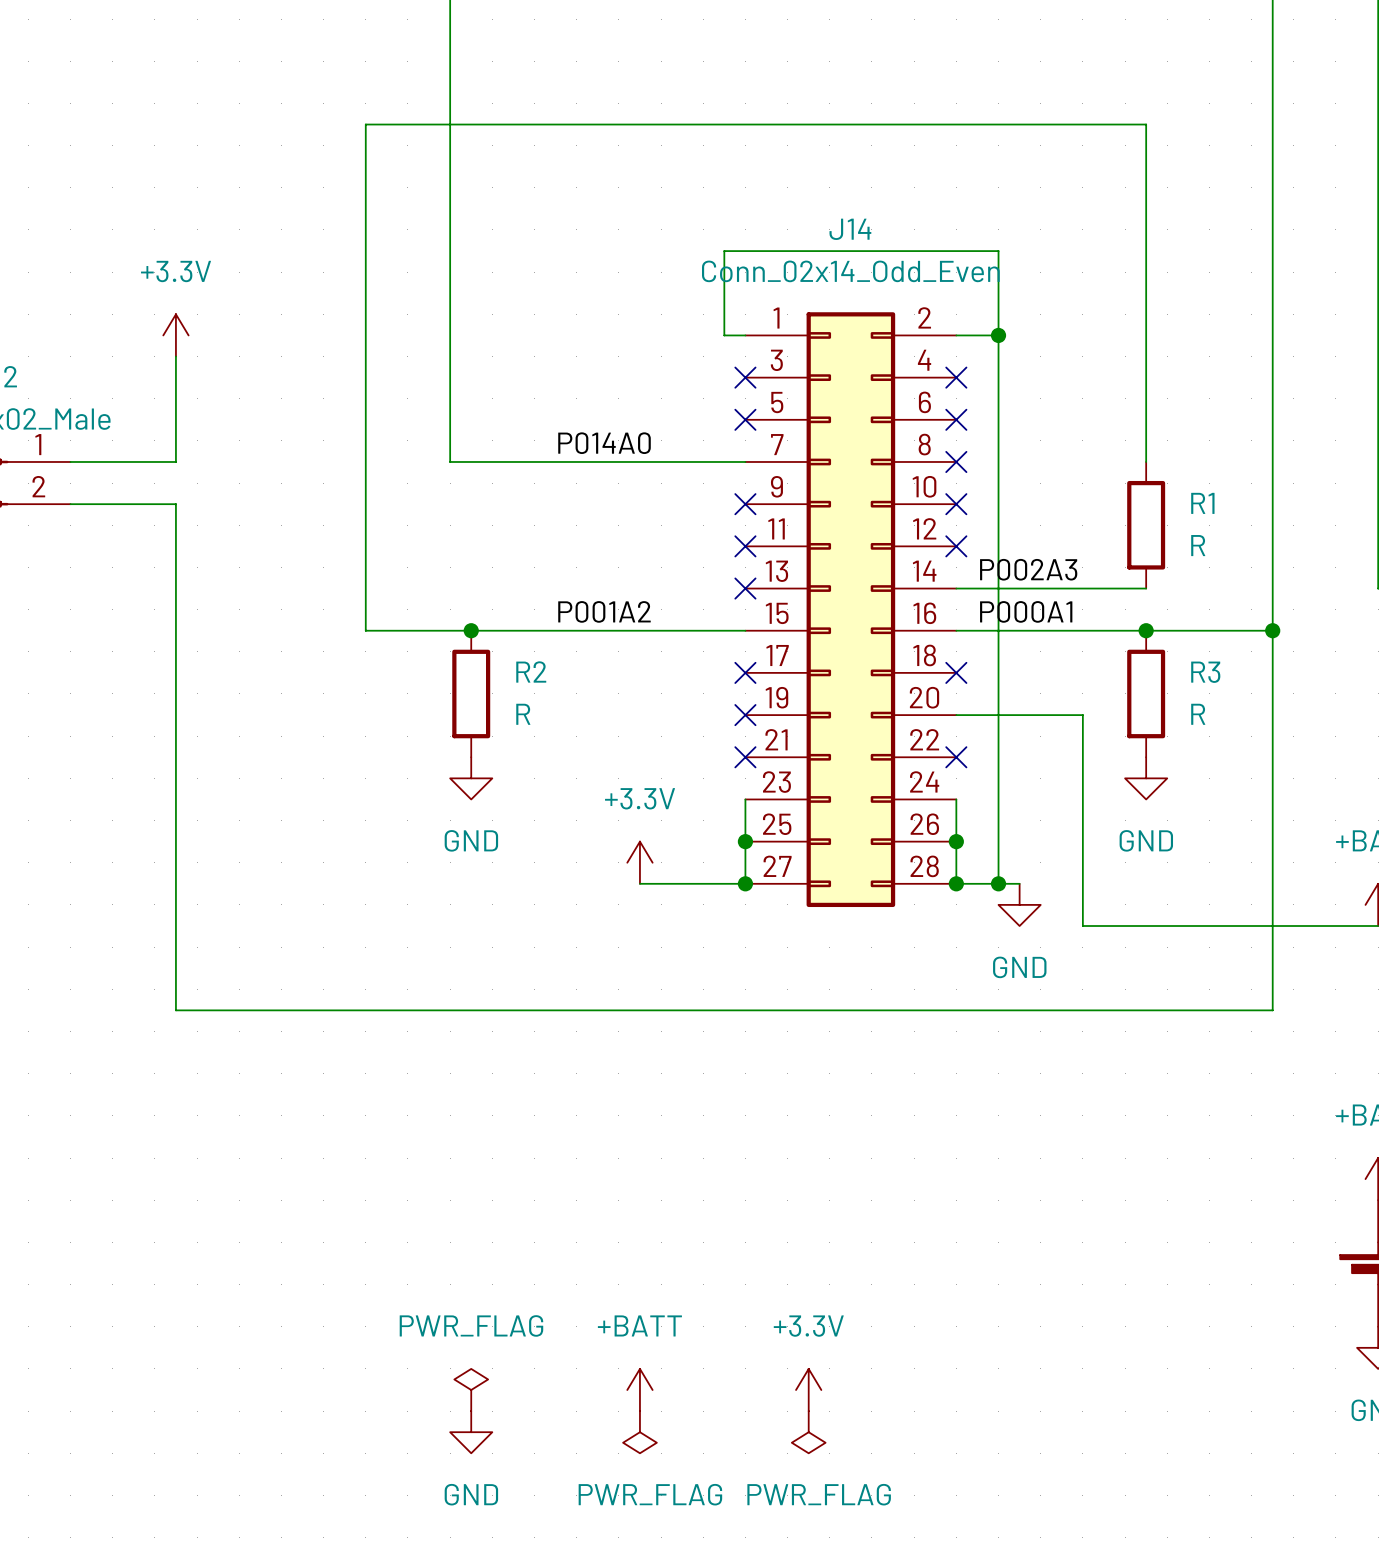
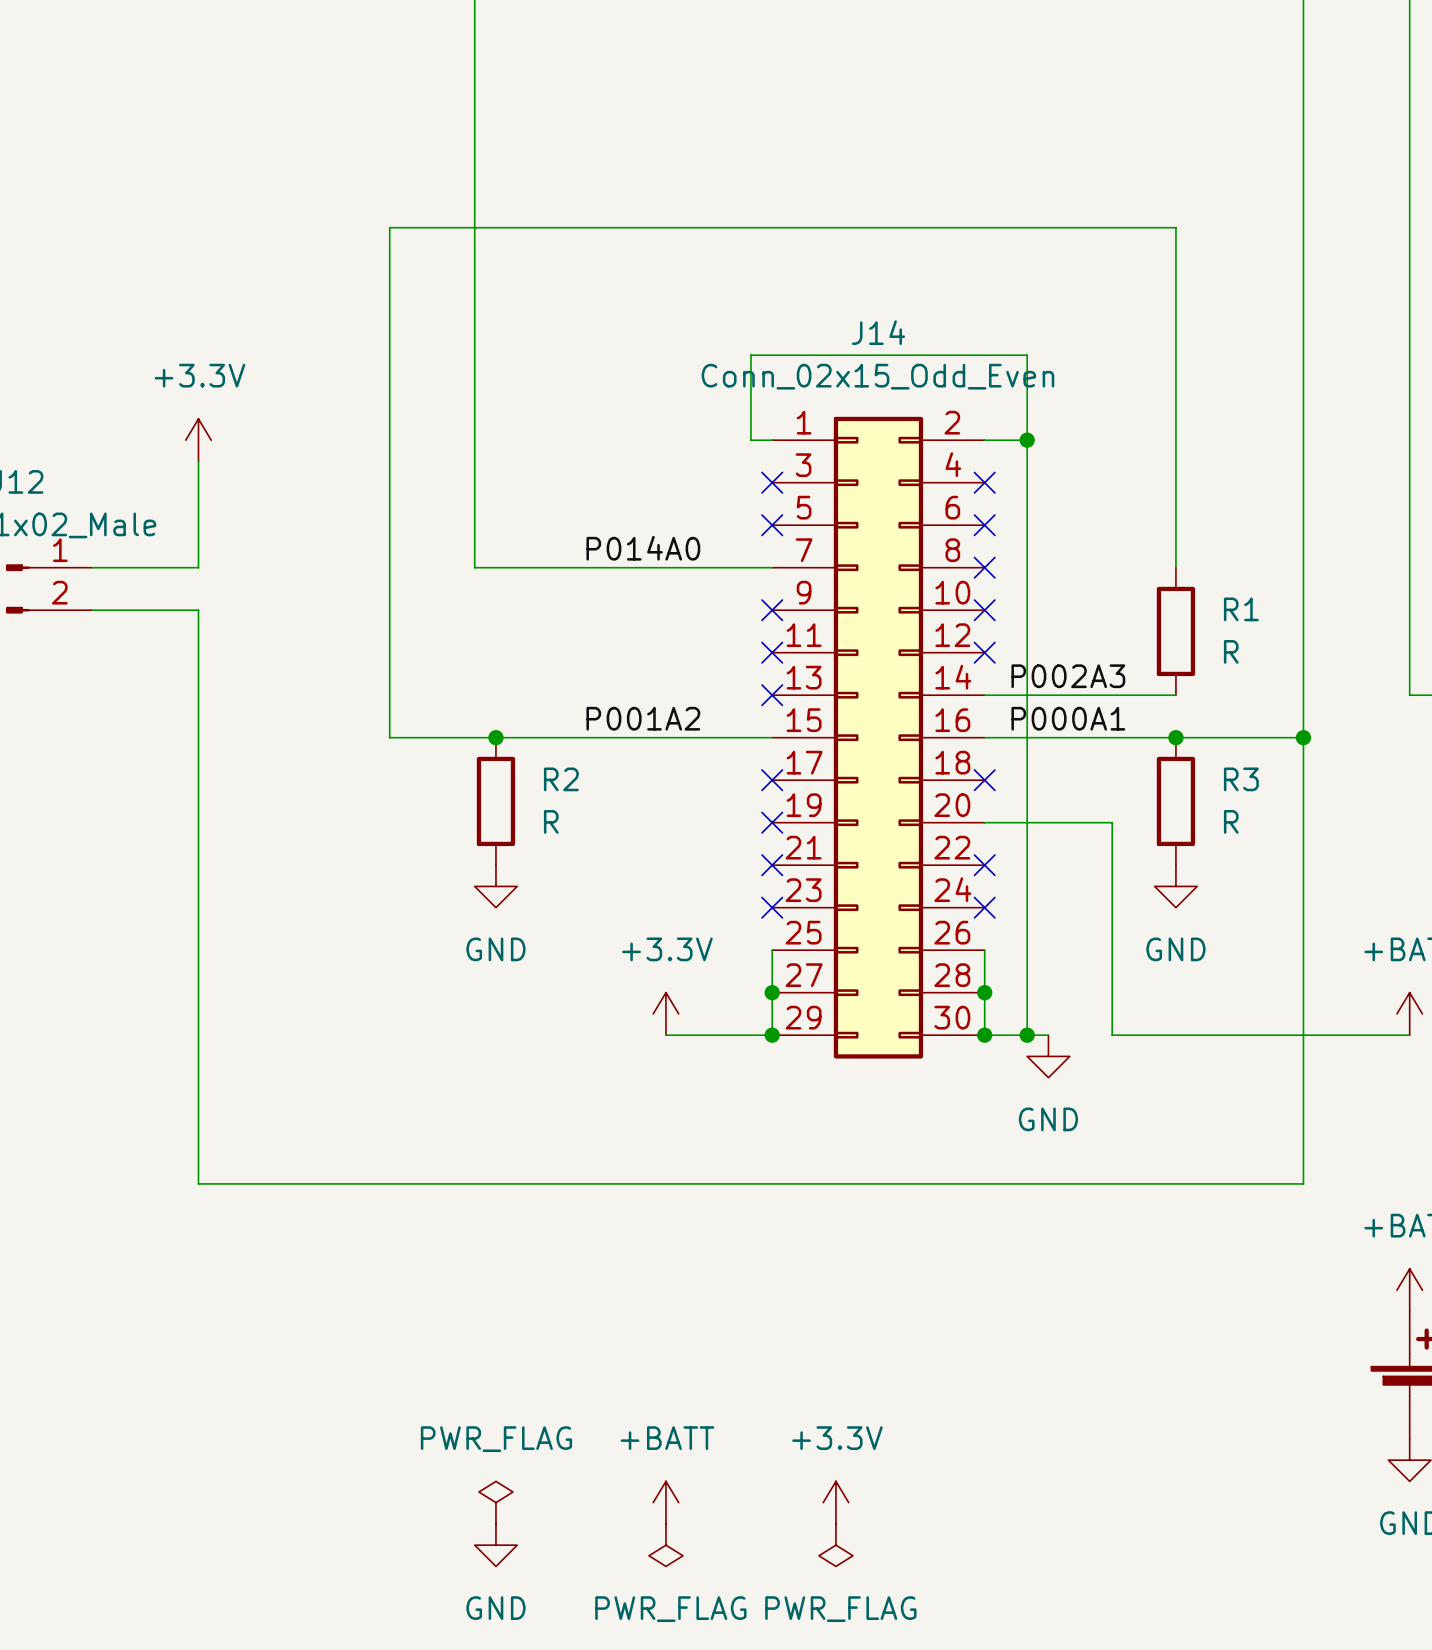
J14 value: Conn_02x14_Odd_Even (850, 271) -> Conn_02x15_Odd_Even (877, 376)
J14 symbol: [745, 312, 957, 908] -> [772, 416, 985, 1059]
wire: (745, 799) (745, 841) -> none
no-connect mark: none -> (772, 907)
wire: (956, 799) (956, 841) -> (1027, 992) (1027, 1035)
no-connect mark: none -> (984, 907)
junction position: (745, 841) -> (772, 1035)
junction: (956, 841) -> none
power symbol position: +3.3V (639, 862) -> +3.3V (665, 1013)
wire: (639, 883) (745, 883) -> (665, 1035) (772, 1035) (772, 992)
wire: (956, 883) (1019, 883) -> (984, 992) (984, 1035) (1048, 1035)
junction: (998, 883) -> none
power symbol position: GND (1019, 904) -> GND (1048, 1056)
junction: none -> (984, 1035)
junction: none -> (1027, 1035)
wire: (175, 1010) (1272, 1010) -> (198, 1120) (198, 1183) (1303, 1183) (1303, 1120)

